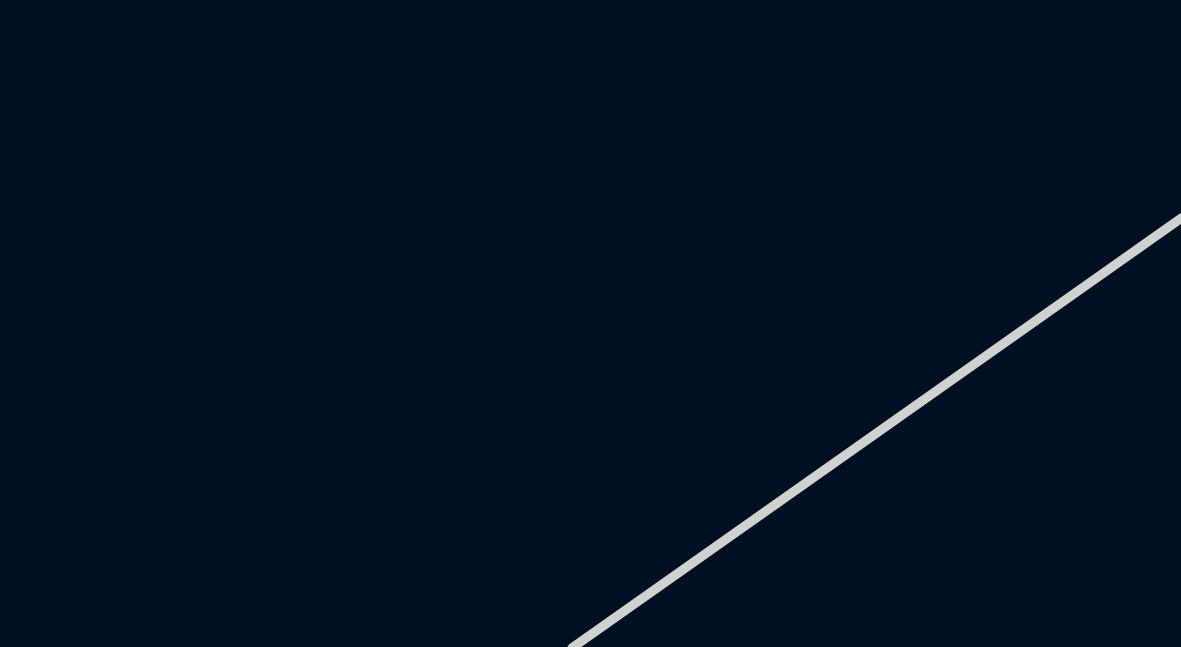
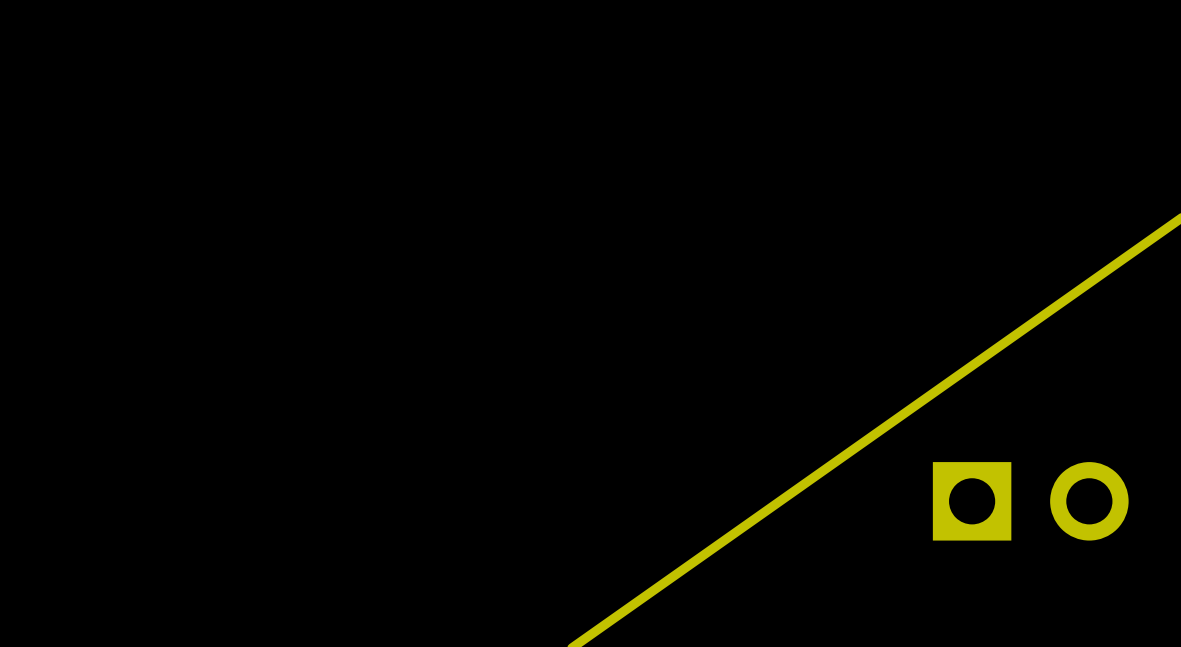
part: none -> (1030, 501)

